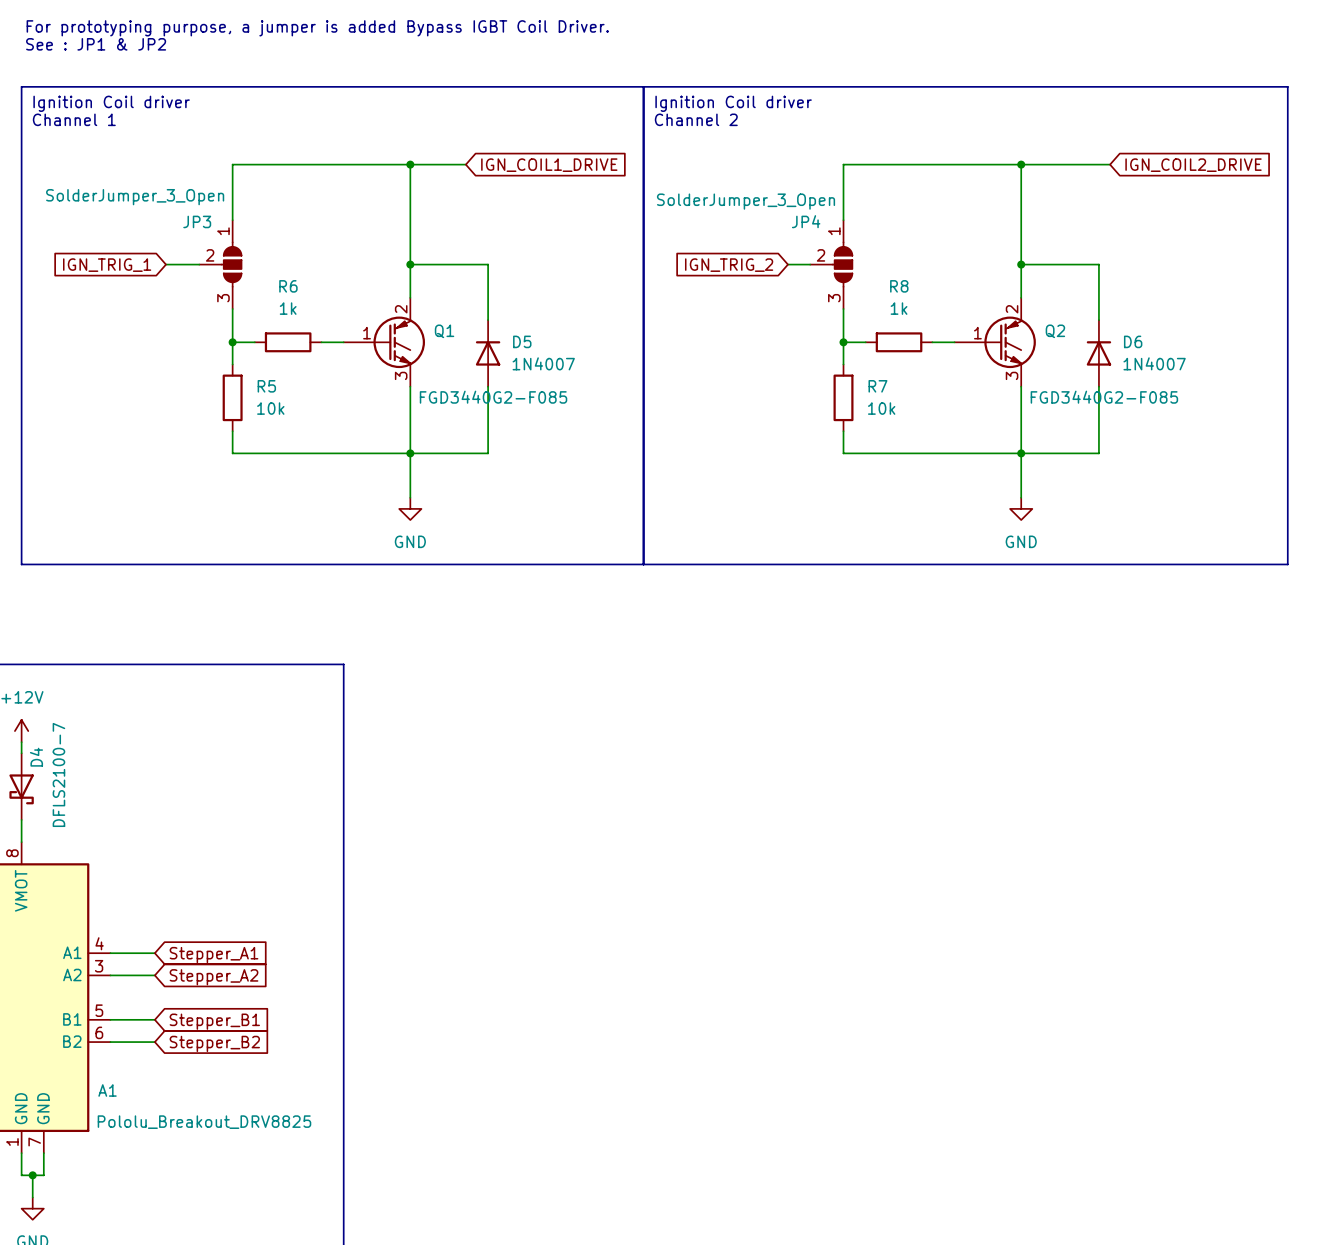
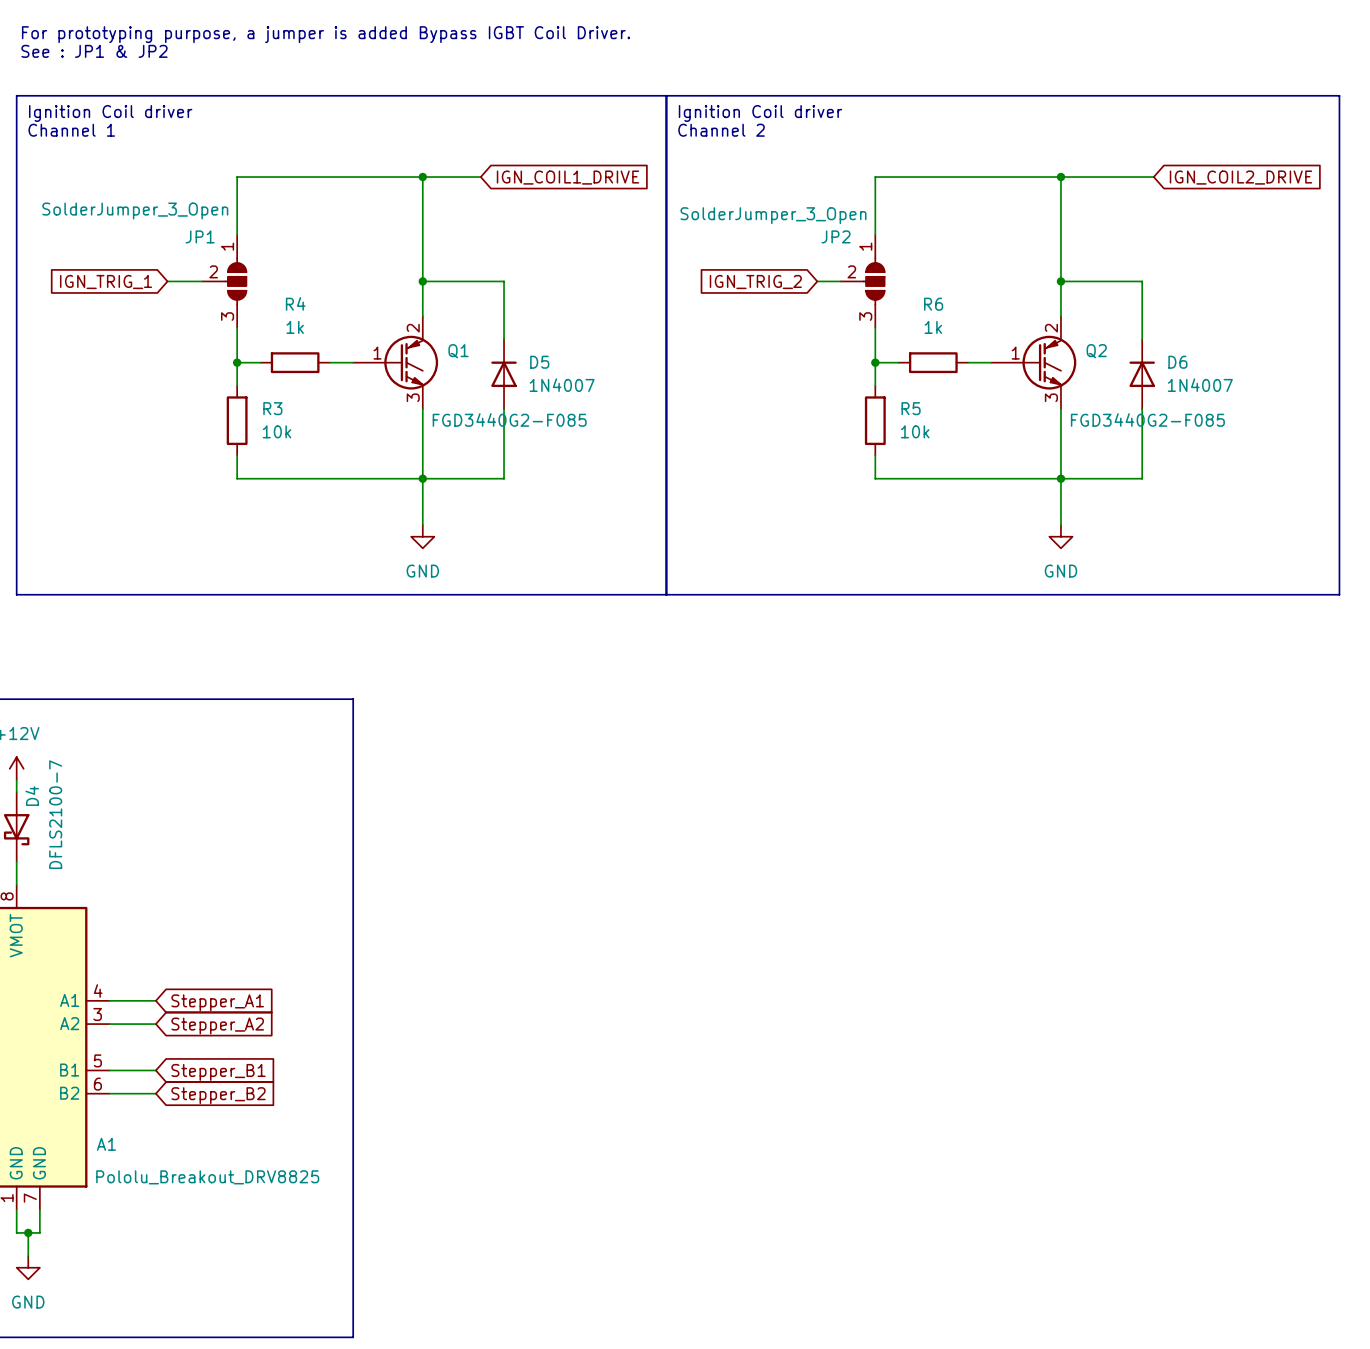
JP3 name: JP3 (197, 221) -> JP1 (200, 236)
JP4 name: JP4 (806, 221) -> JP2 (836, 236)
R6 name: R6 (288, 286) -> R4 (295, 303)
R8 name: R8 (899, 286) -> R6 (933, 304)
R5 name: R5 (266, 386) -> R3 (272, 408)
R7 name: R7 (877, 386) -> R5 (911, 408)

